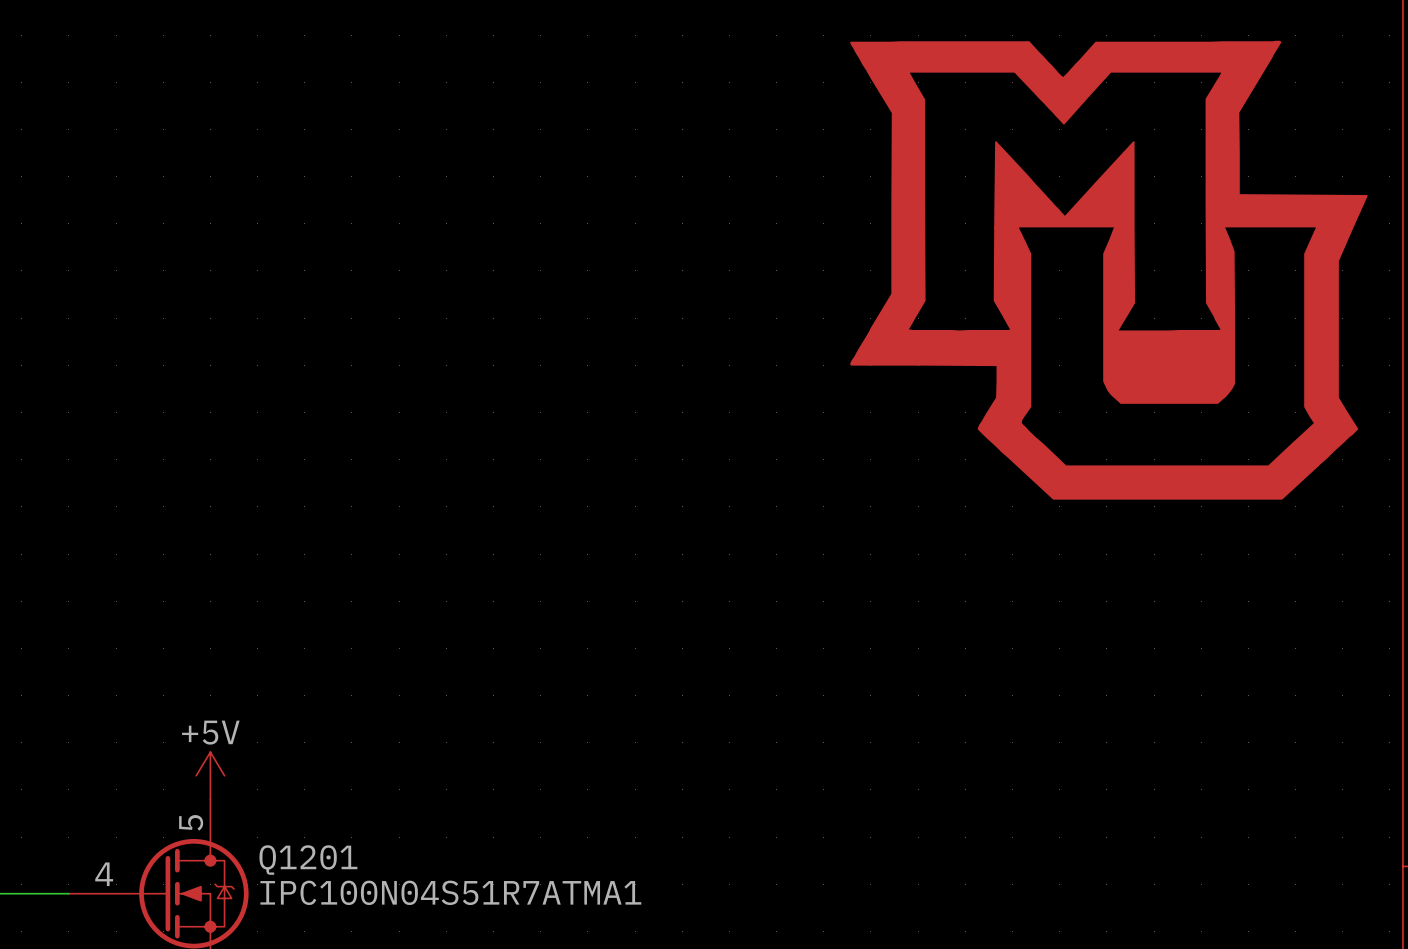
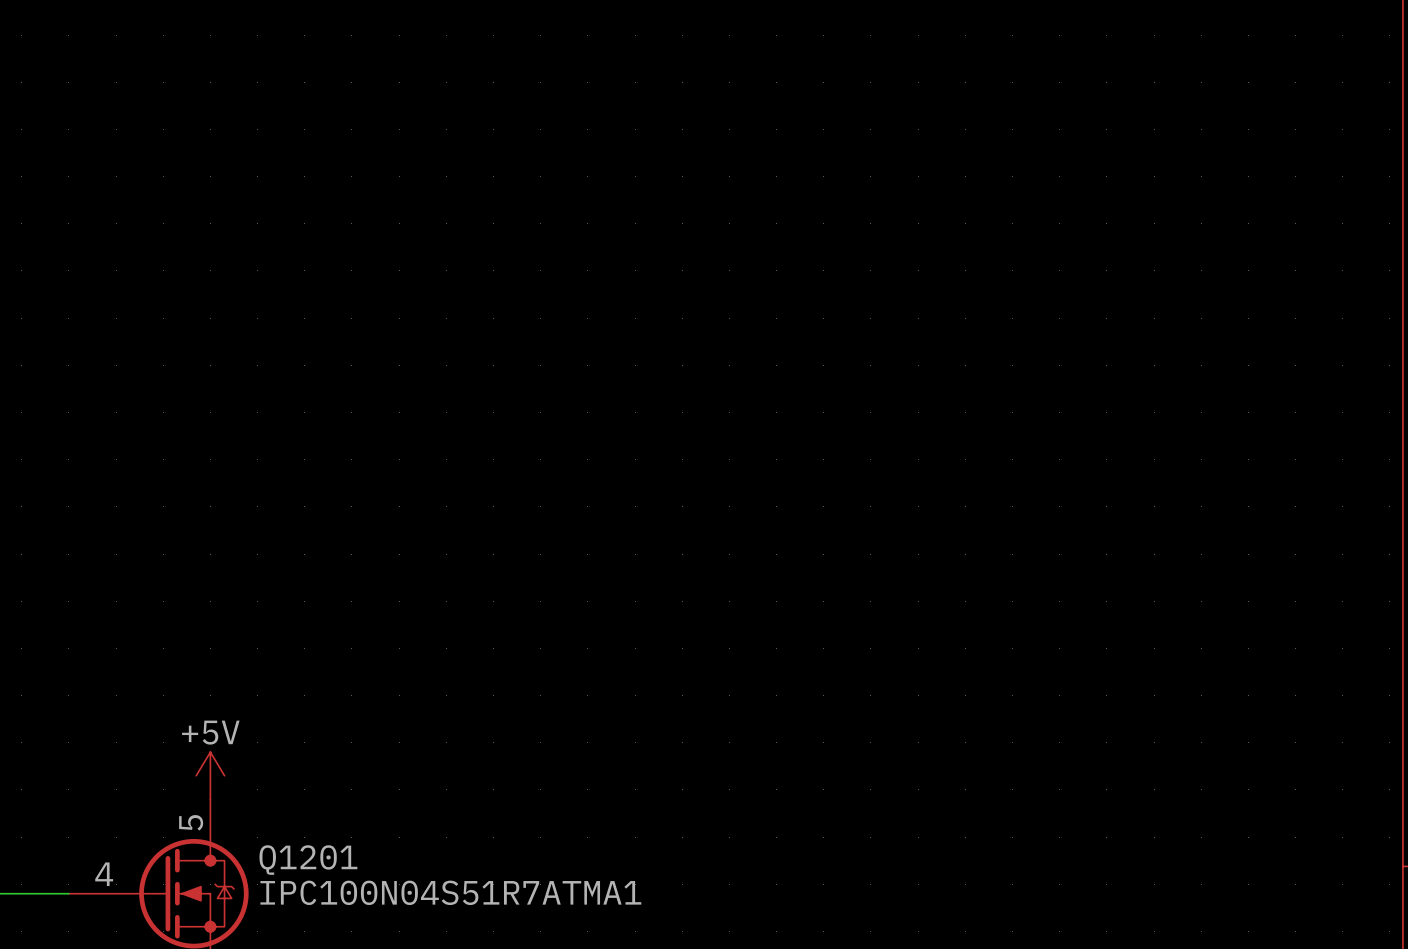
power symbol: (1108, 270) -> none

